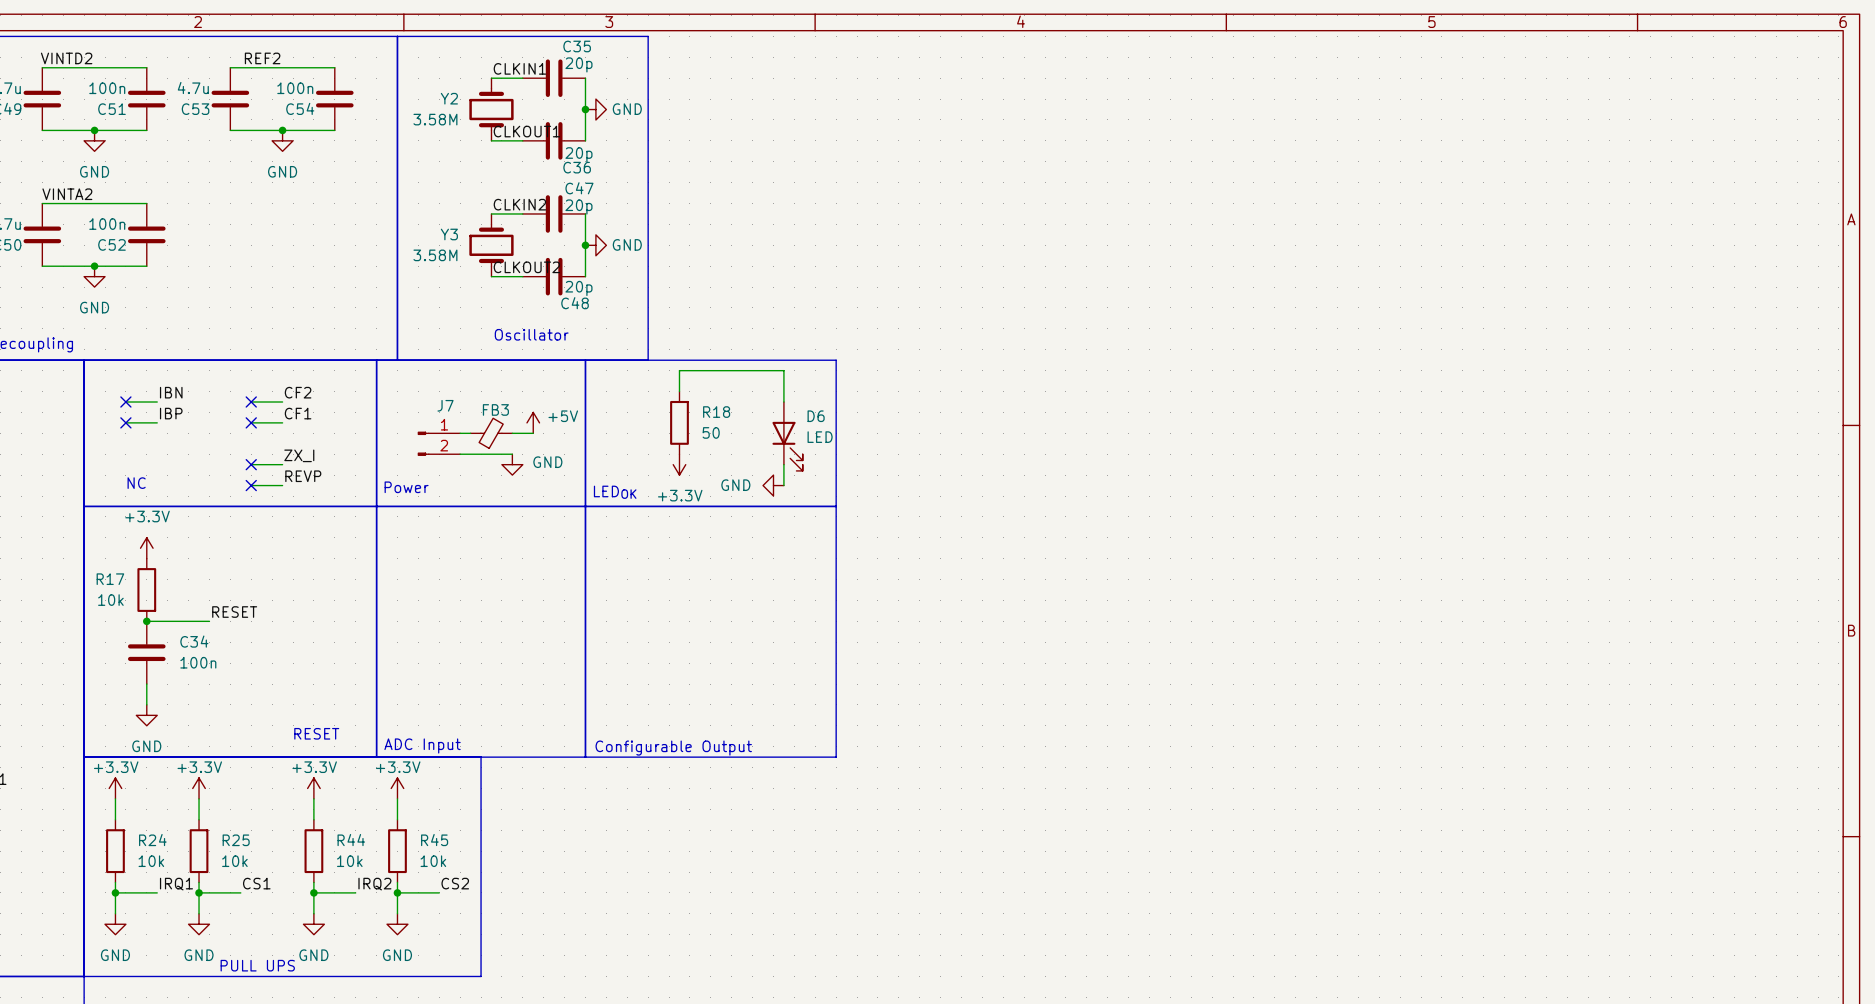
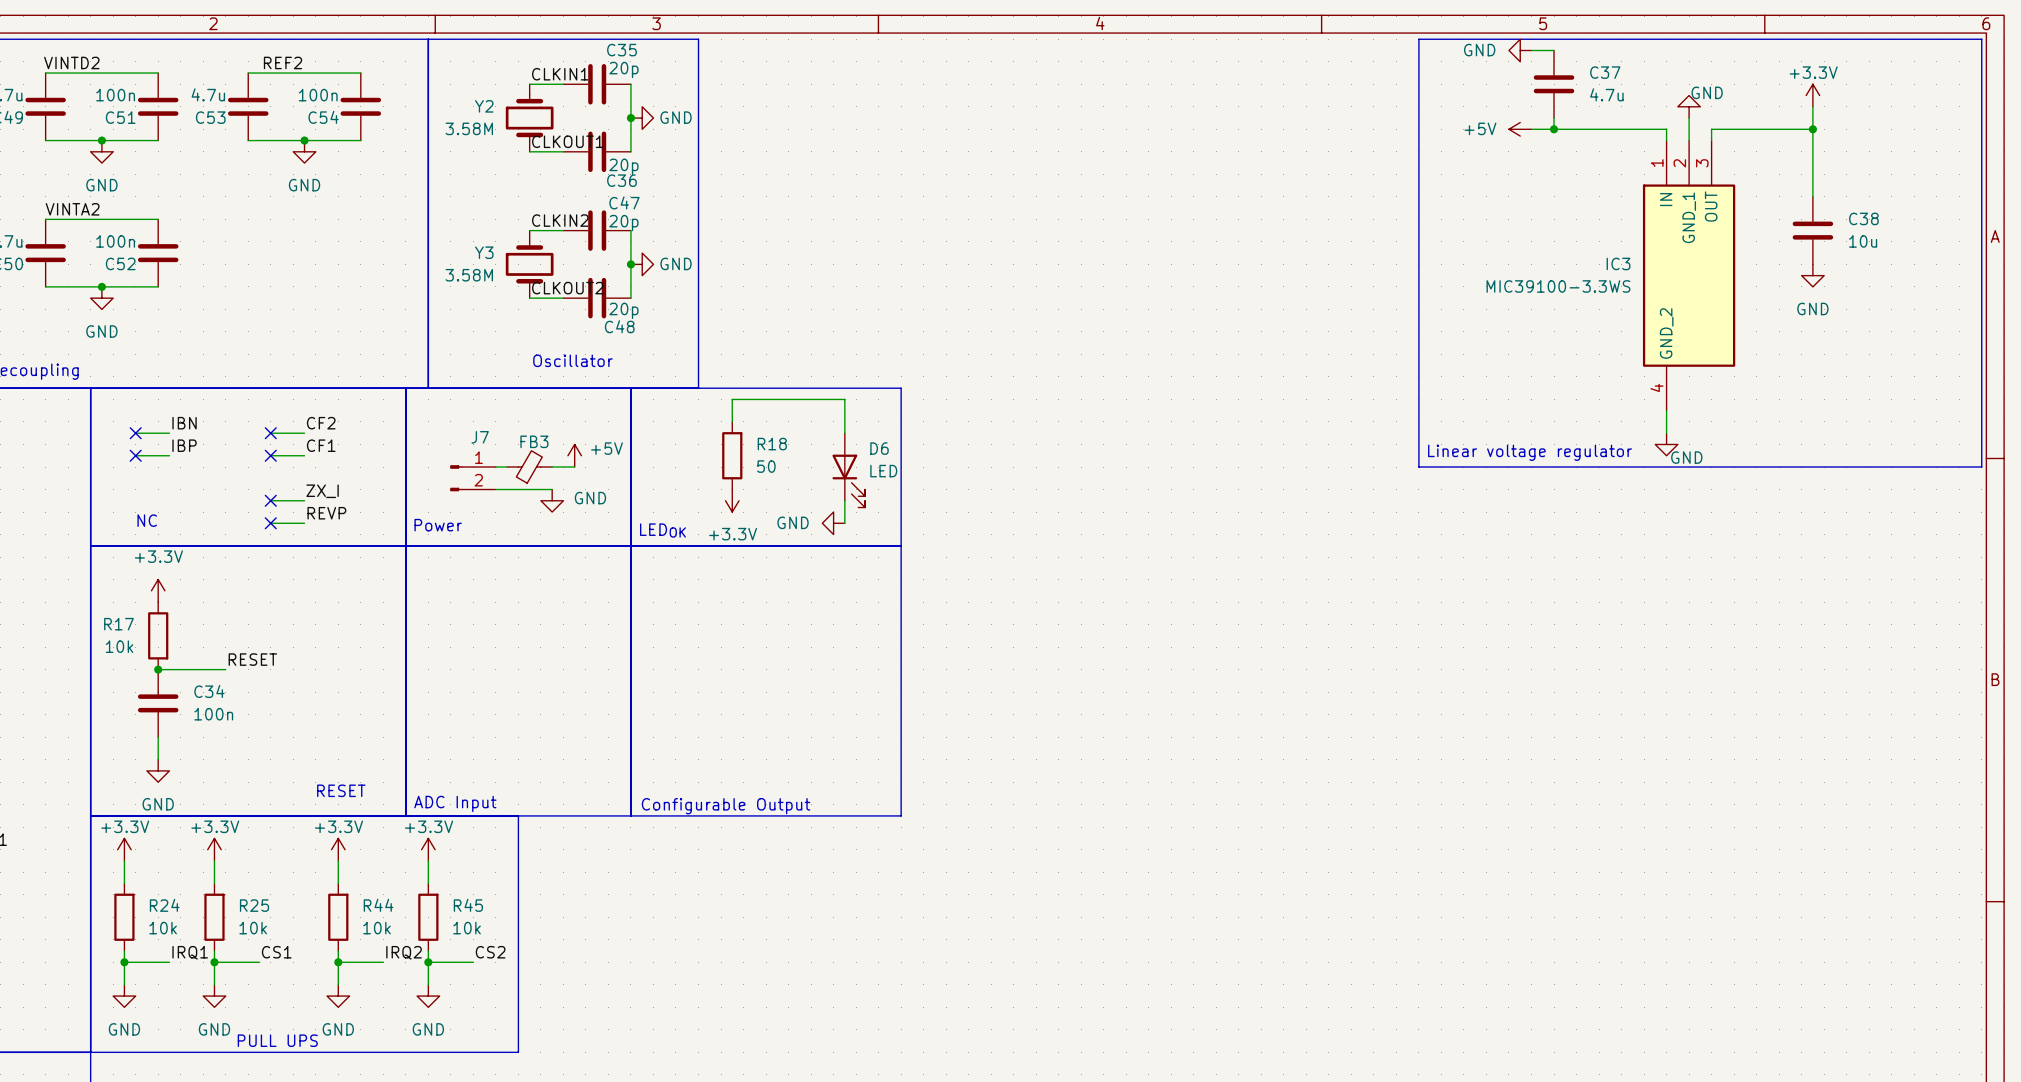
line: none -> (1418, 39) (1981, 39) (1981, 467) (1418, 467) (1418, 39)
power symbol: none -> GND (1520, 50)
wire: none -> (1531, 50) (1554, 50)
C37: none -> 4.7u (1554, 84)
power symbol: none -> +3.3V (1812, 95)
power symbol: none -> GND (1689, 106)
wire: none -> (1812, 106) (1812, 196)
wire: none -> (1554, 118) (1554, 129)
wire: none -> (1689, 118) (1689, 140)
power symbol: none -> +5V (1520, 129)
wire: none -> (1531, 129) (1666, 129) (1666, 140)
junction: none -> (1554, 129)
wire: none -> (1812, 129) (1711, 129) (1711, 140)
junction: none -> (1812, 129)
C38: none -> 10u (1812, 230)
IC3: none -> MIC39100-3.3WS (1689, 275)
power symbol: none -> GND (1812, 275)
wire: none -> (1666, 410) (1666, 433)
power symbol: none -> GND (1666, 444)
text: none -> Linear voltage regulator (1530, 452)

